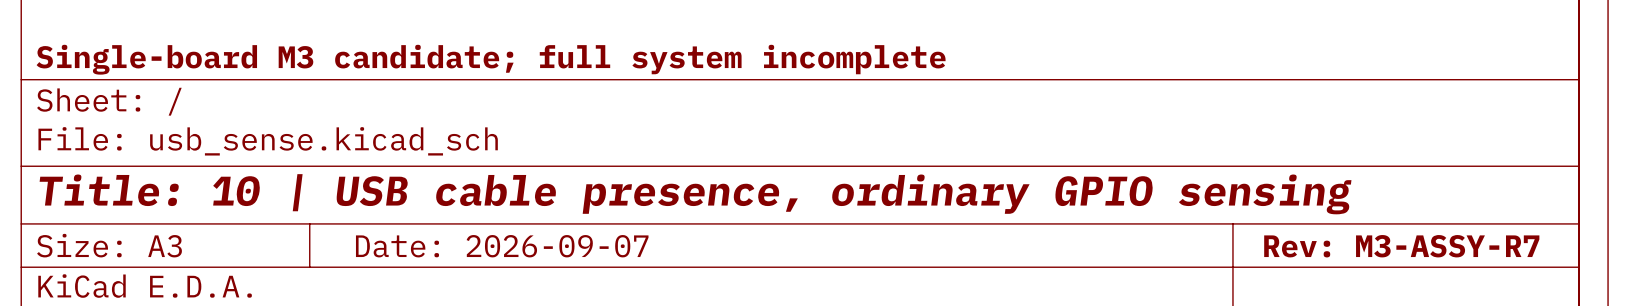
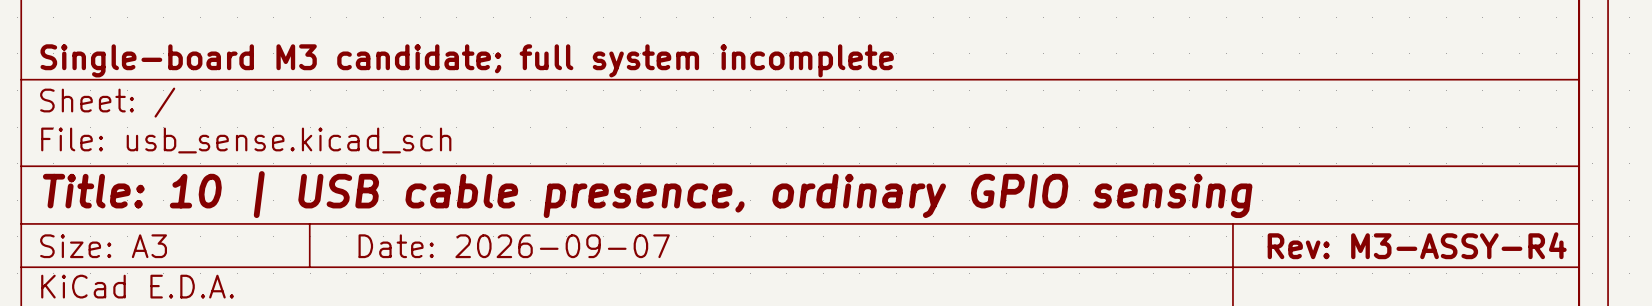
title block: Rev: M3-ASSY-R7 (1401, 246) -> Rev: M3-ASSY-R4 (1417, 245)

